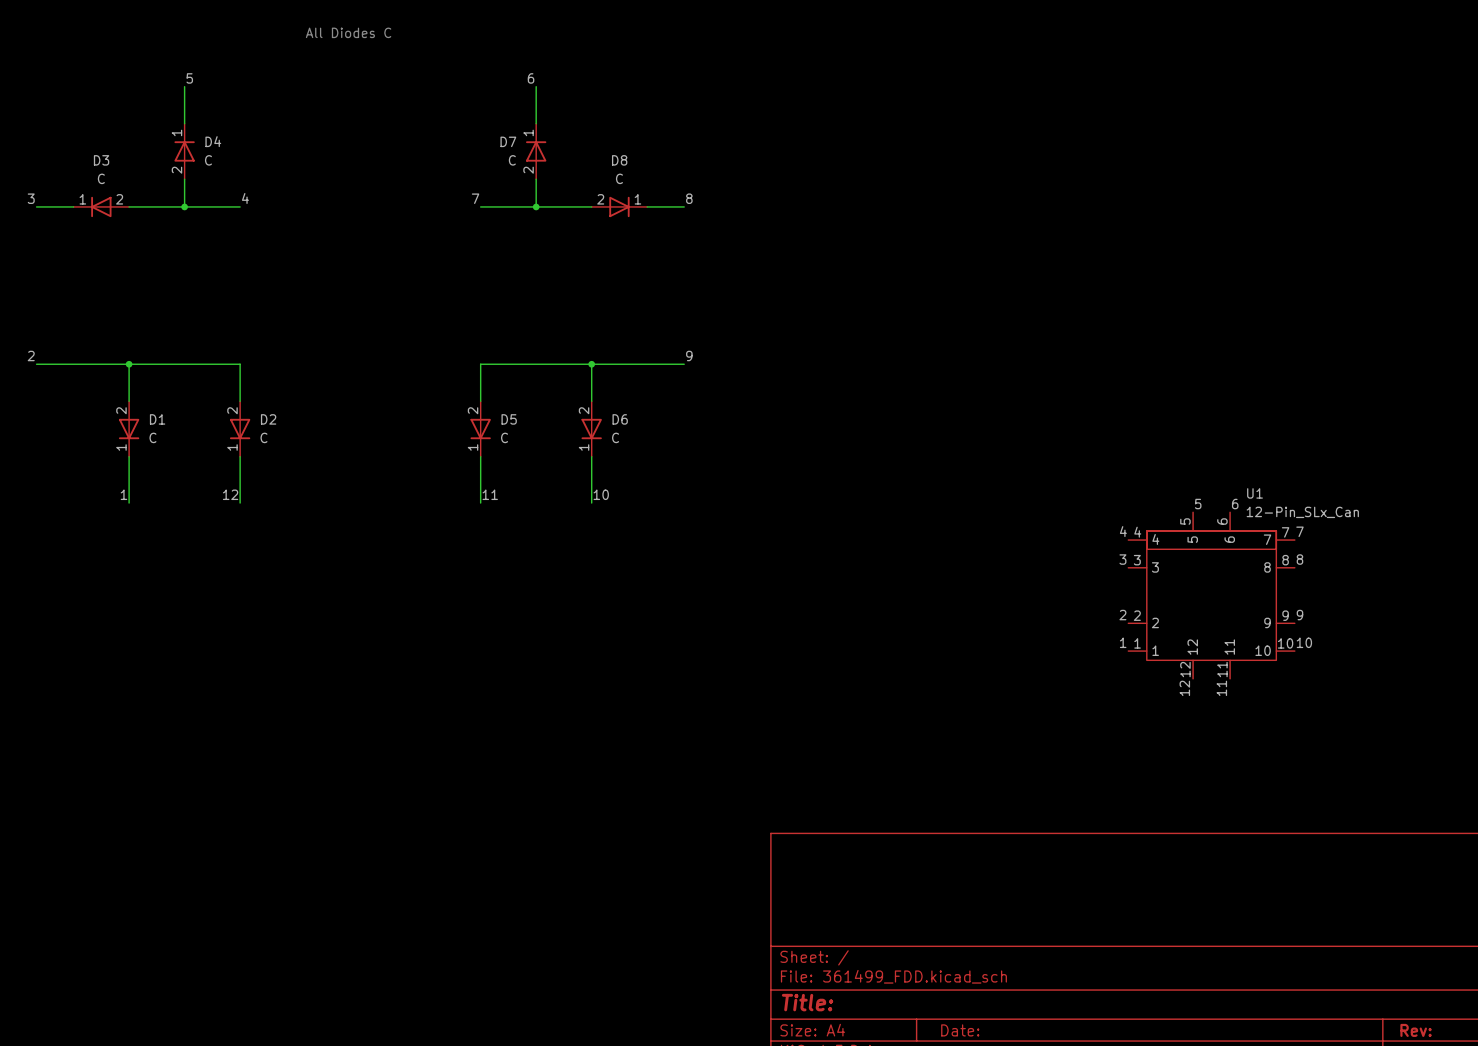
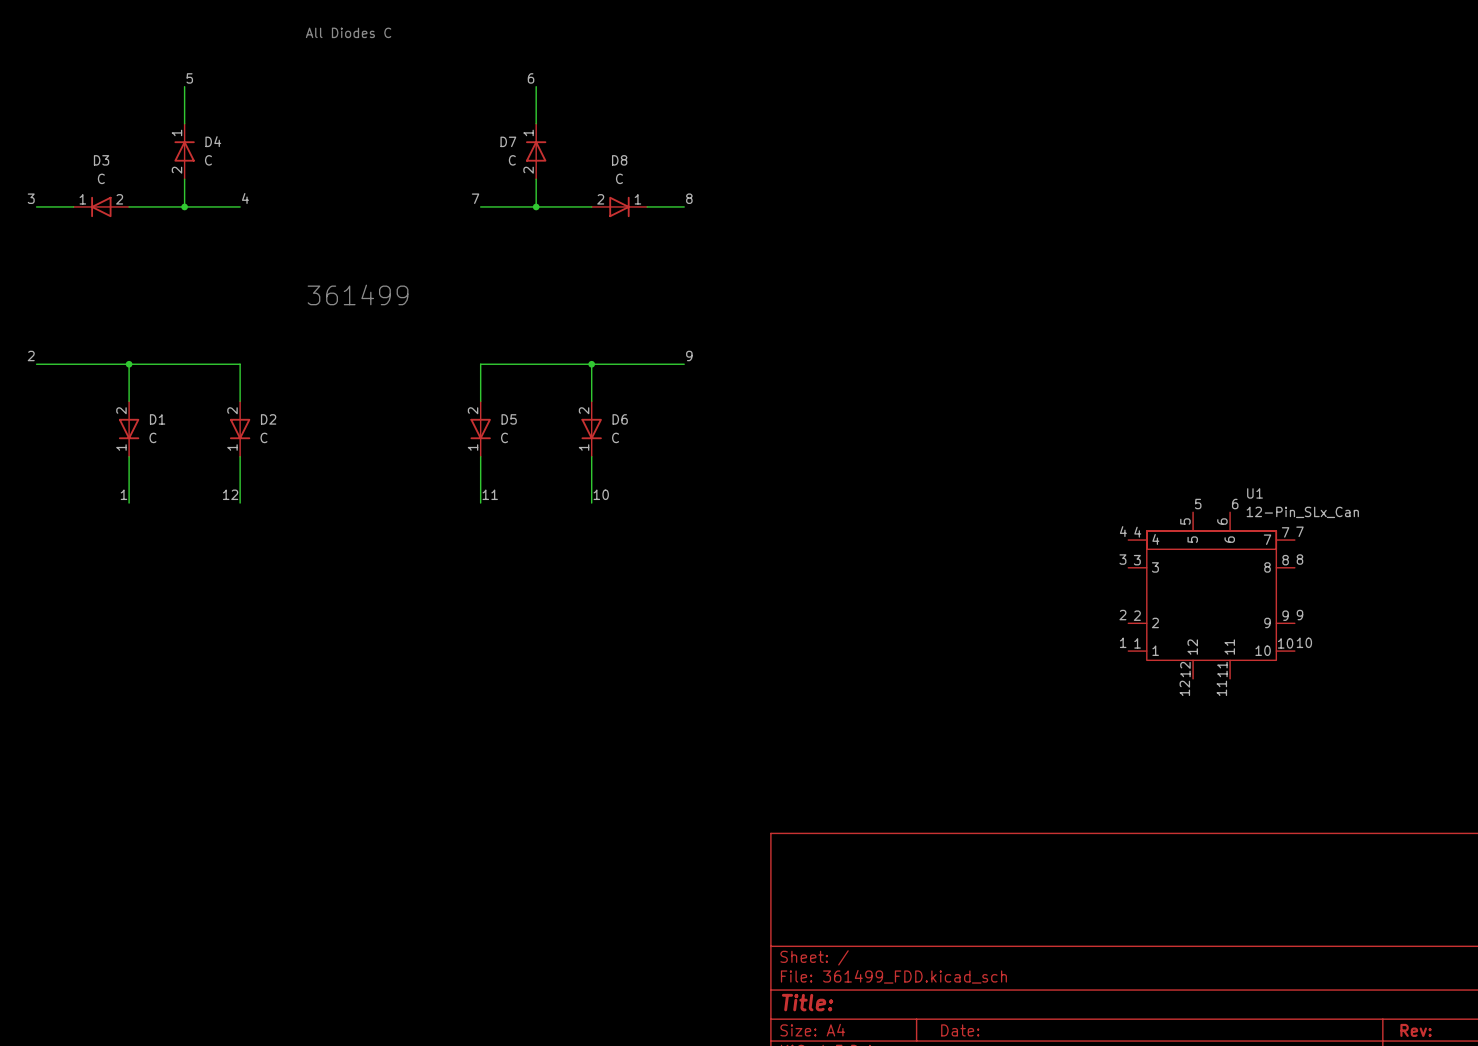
text: none -> 361499 (358, 294)

